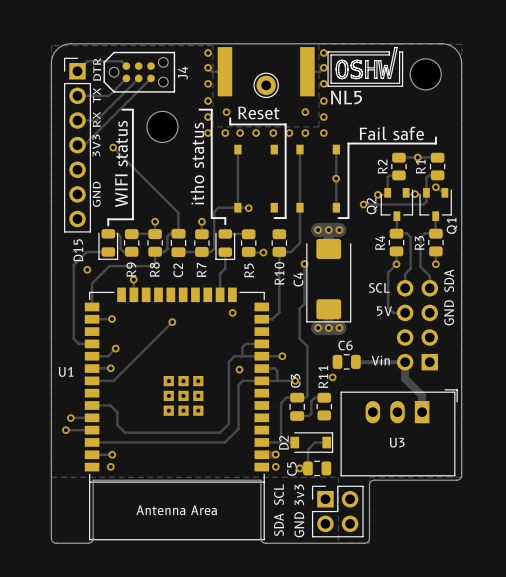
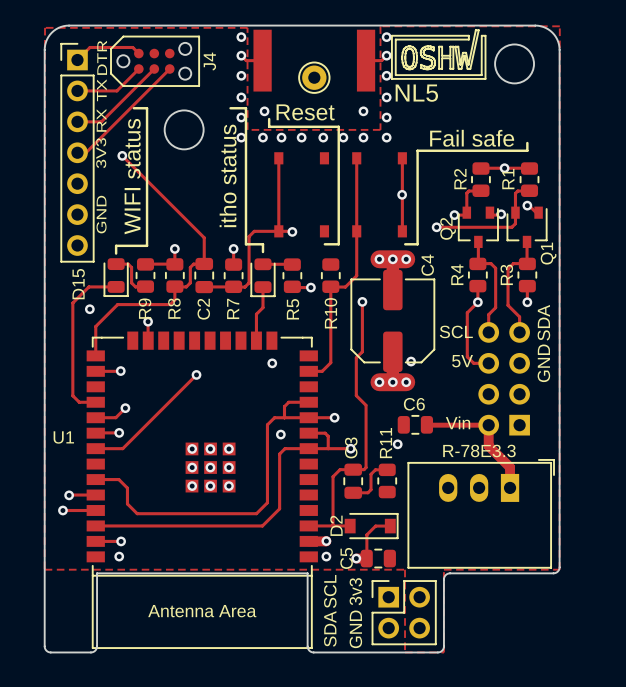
C4 footprint: [306, 238, 352, 323] -> [350, 269, 436, 373]
C4 name position: C4 (298, 279) -> C4 (427, 265)
via: none -> (411, 361)
U3 name: U3 (397, 442) -> R-78E3.3 (479, 450)

